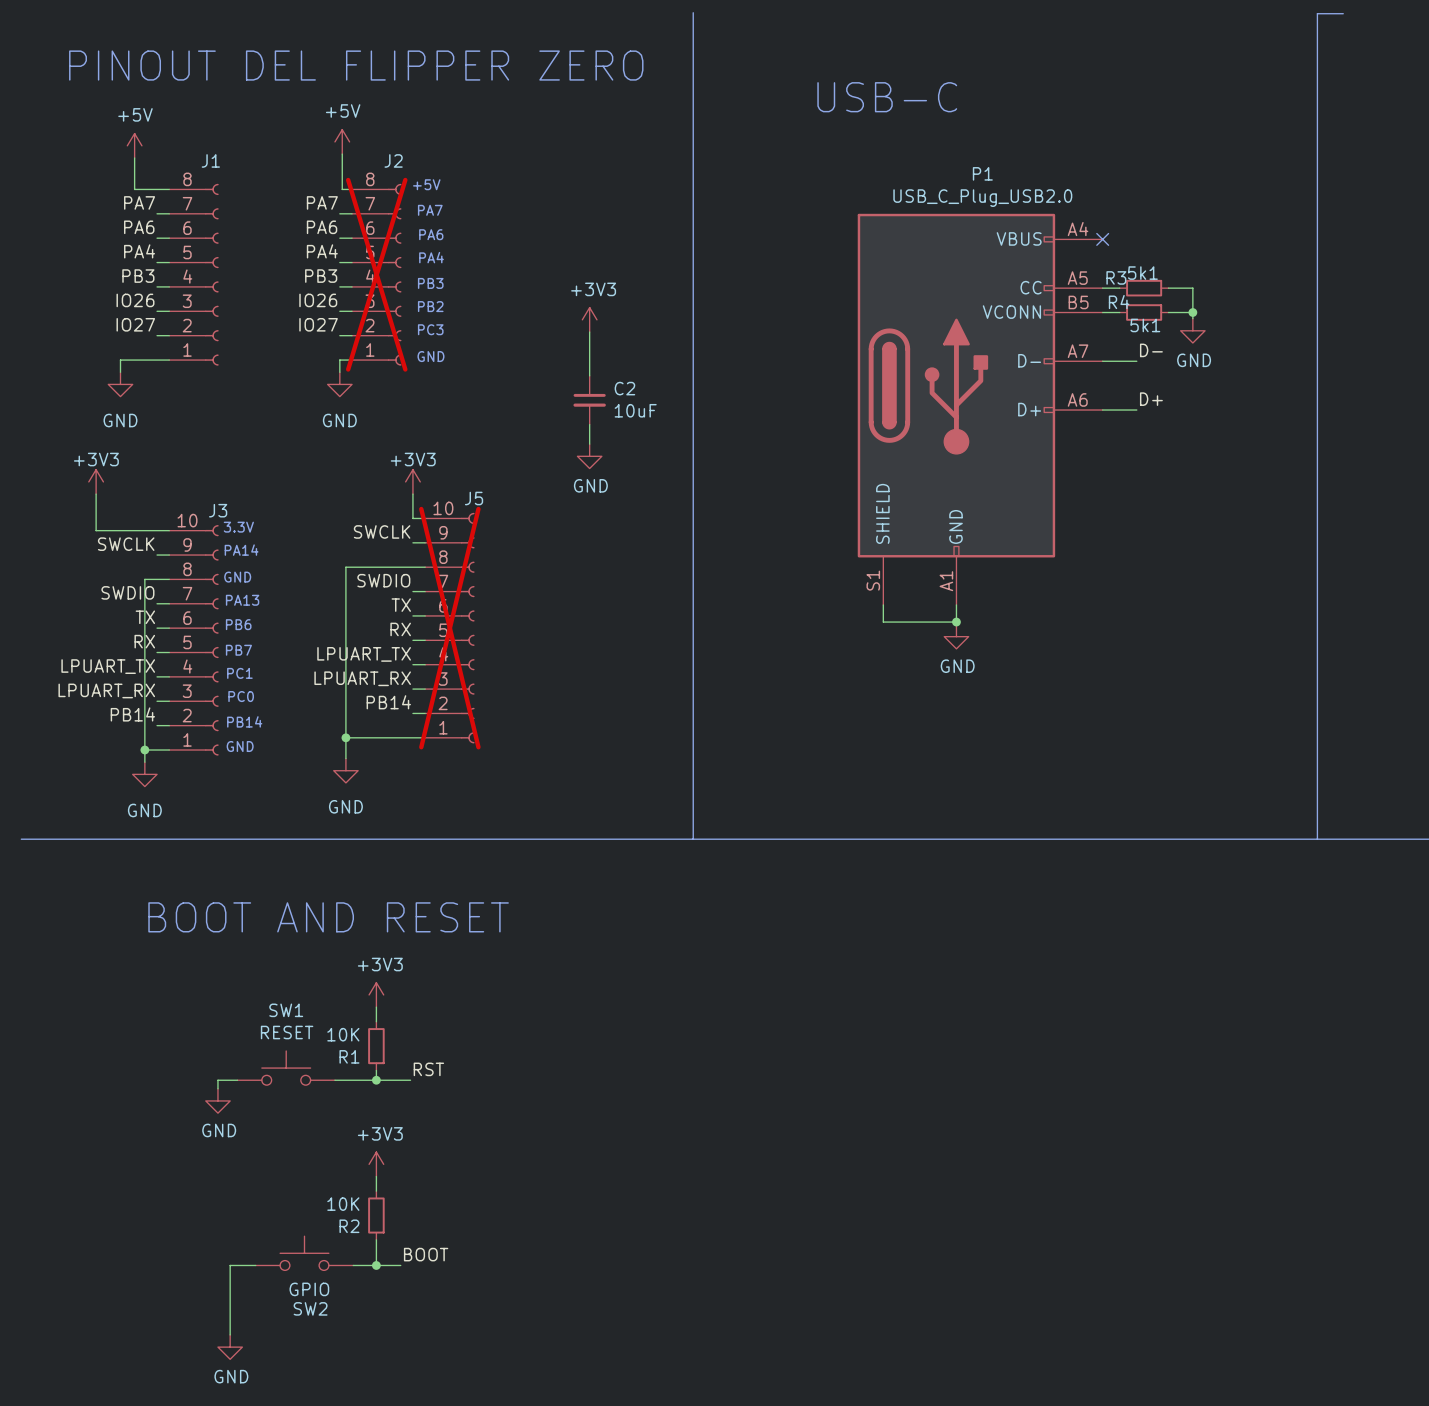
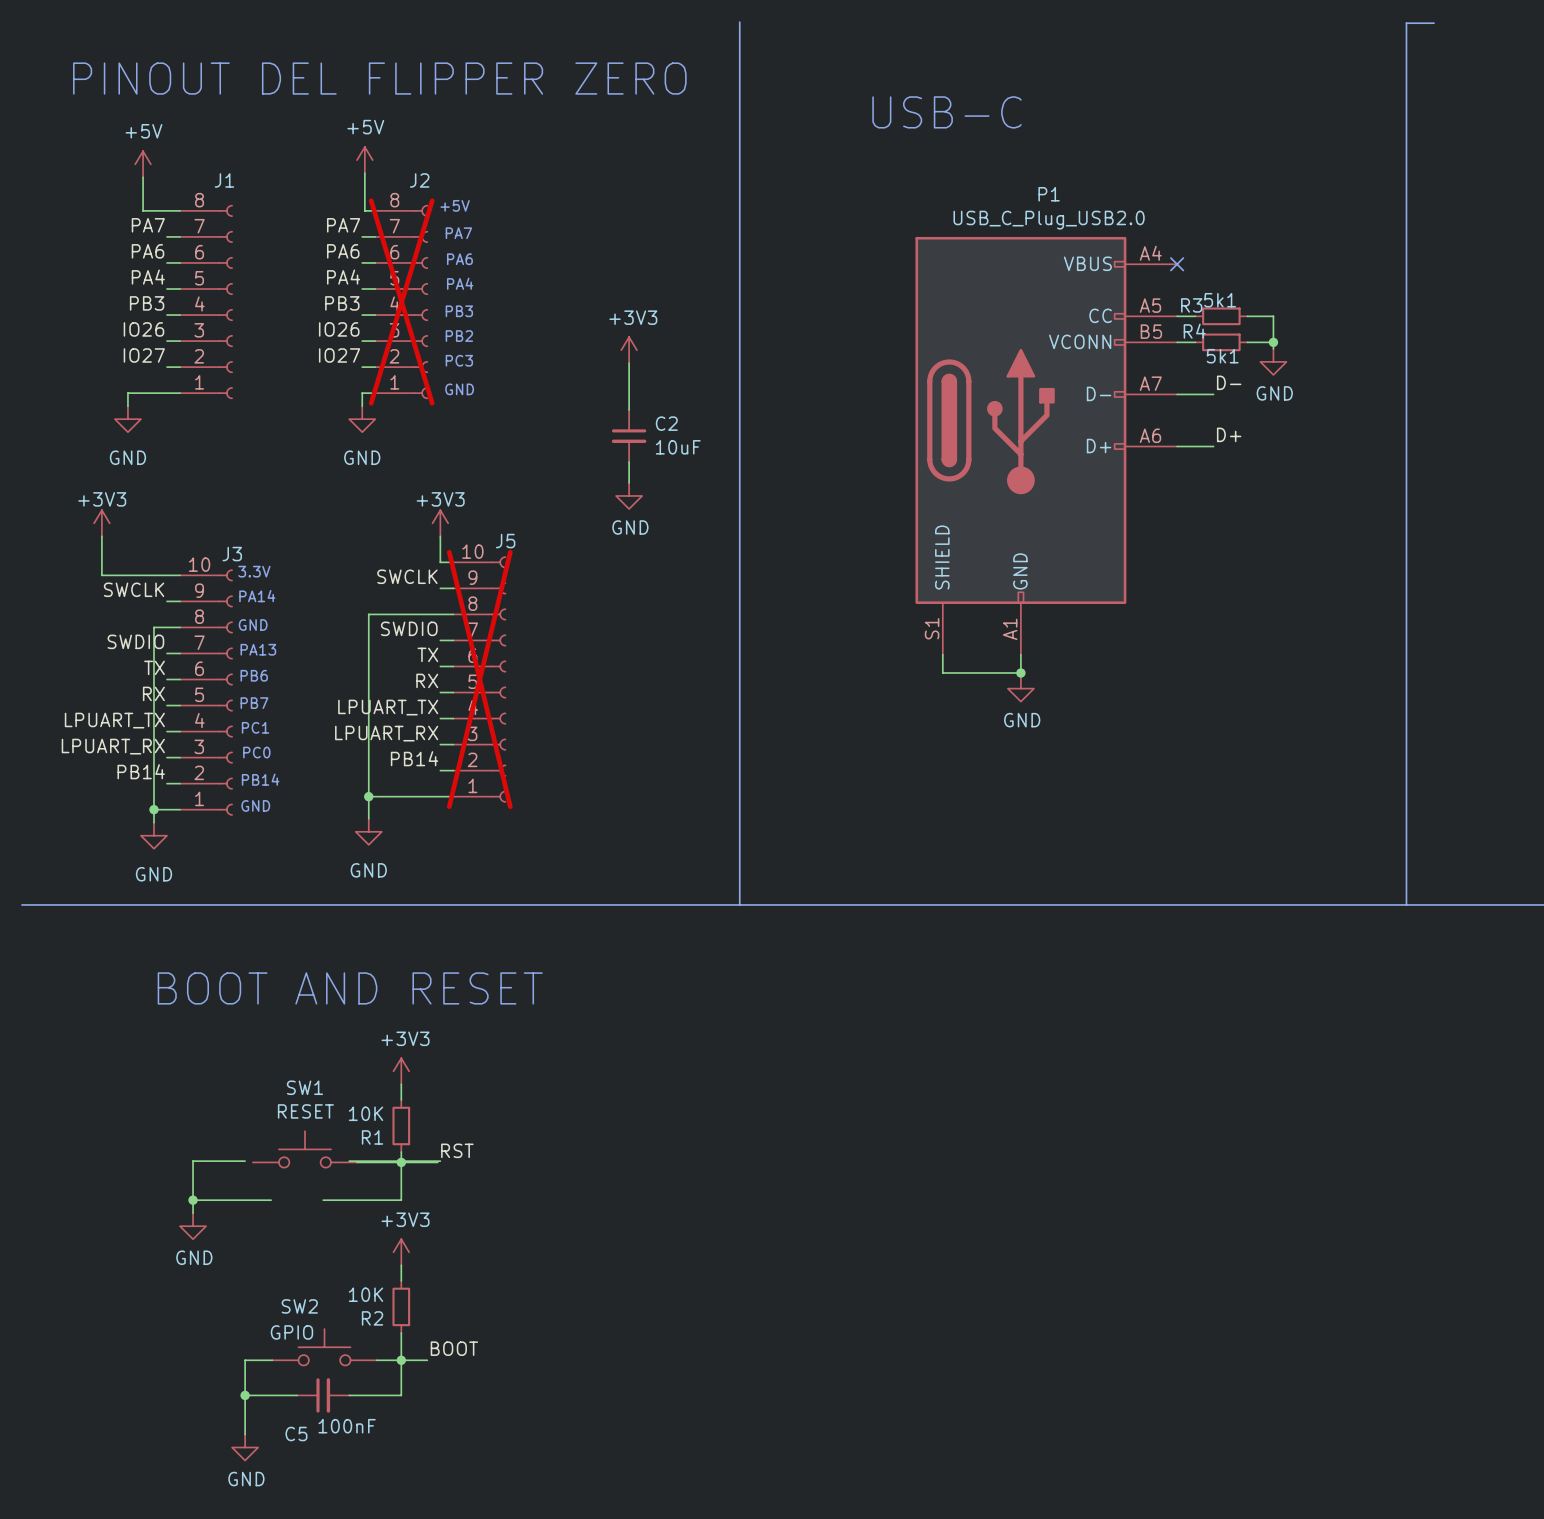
wire: none -> (245, 1161) (193, 1161) (193, 1213)
wire: none -> (349, 1161) (440, 1161)
wire: (237, 1080) (217, 1080) (217, 1088) -> none
wire: none -> (401, 1162) (401, 1200) (323, 1200)
power symbol position: GND (217, 1100) -> GND (193, 1226)
wire: none -> (193, 1200) (271, 1200)
junction: none -> (193, 1200)
wire: none -> (401, 1360) (401, 1395) (349, 1395)
SW2 value position: GPIO (309, 1289) -> GPIO (291, 1332)
wire: none -> (245, 1395) (297, 1395)
junction: none -> (245, 1395)
C5: none -> 100nF (323, 1395)
SW2 name position: SW2 (310, 1308) -> SW2 (299, 1306)

